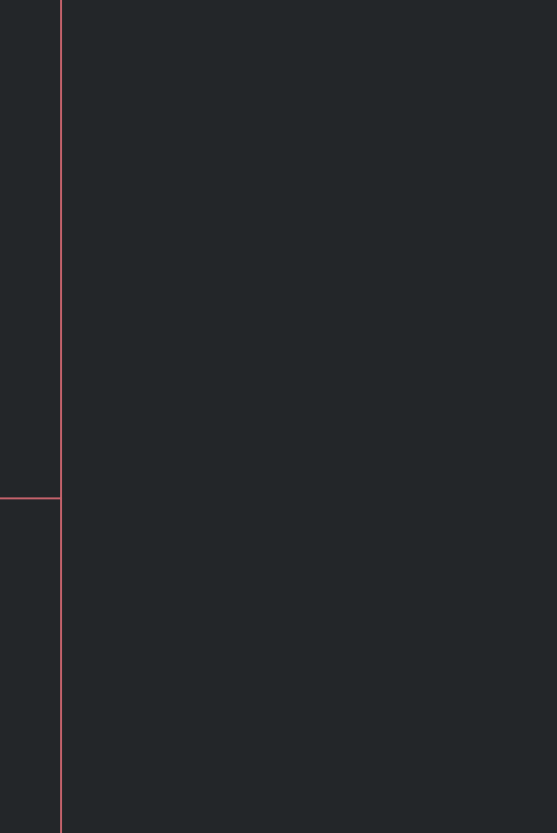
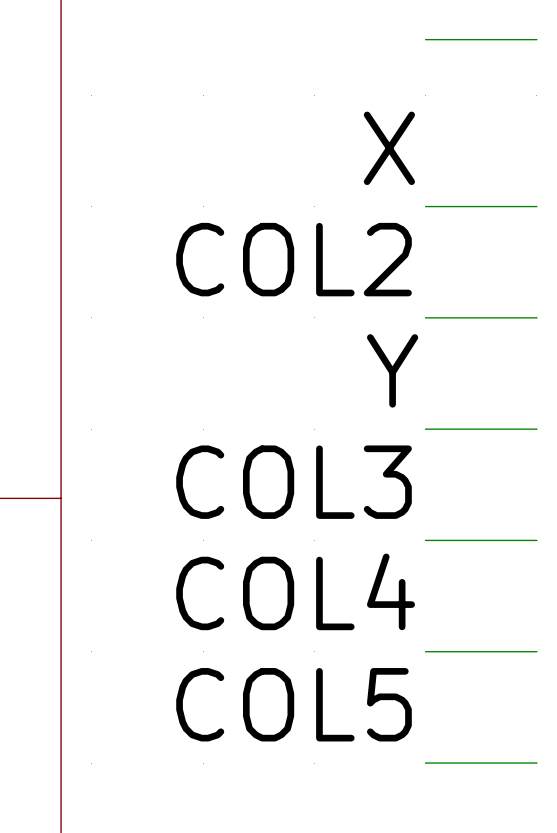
wire: none -> (425, 39) (536, 39)
label: none -> X (389, 148)
wire: none -> (425, 206) (536, 206)
label: none -> COL2 (294, 259)
wire: none -> (425, 317) (536, 317)
label: none -> Y (392, 370)
wire: none -> (425, 429) (536, 429)
label: none -> COL3 (294, 482)
wire: none -> (425, 540) (536, 540)
label: none -> COL4 (295, 591)
wire: none -> (425, 651) (536, 651)
label: none -> COL5 (294, 704)
wire: none -> (425, 763) (536, 763)

